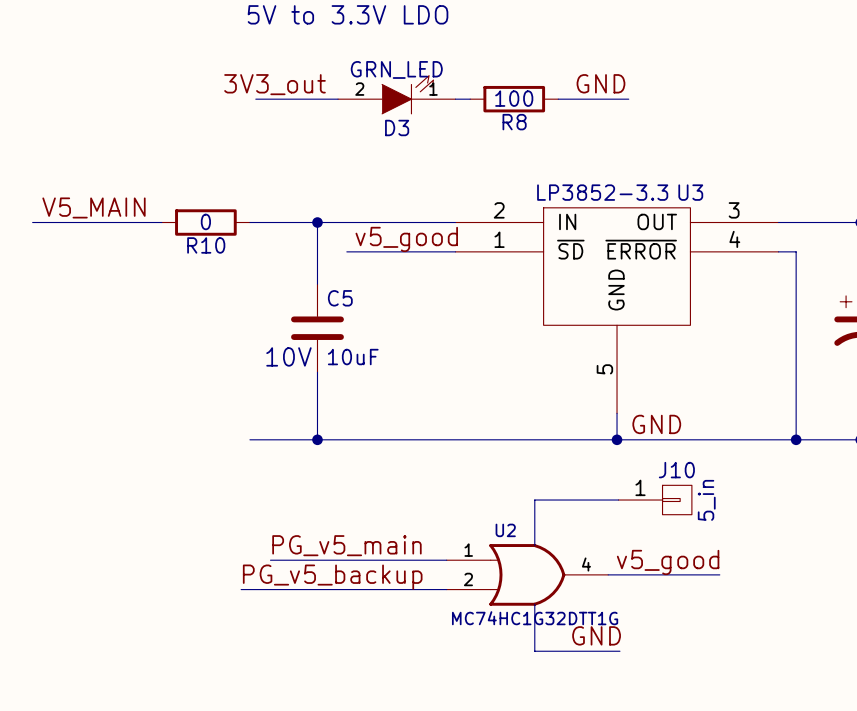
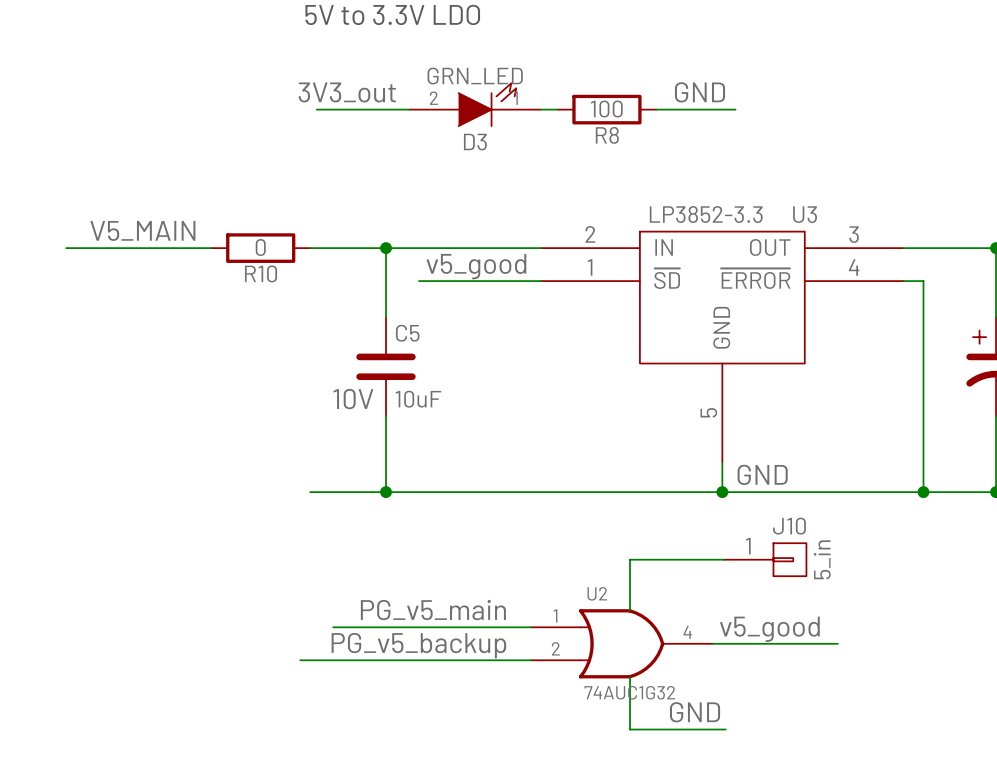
U2 value: MC74HC1G32DTT1G (535, 618) -> 74AUC1G32 (629, 692)

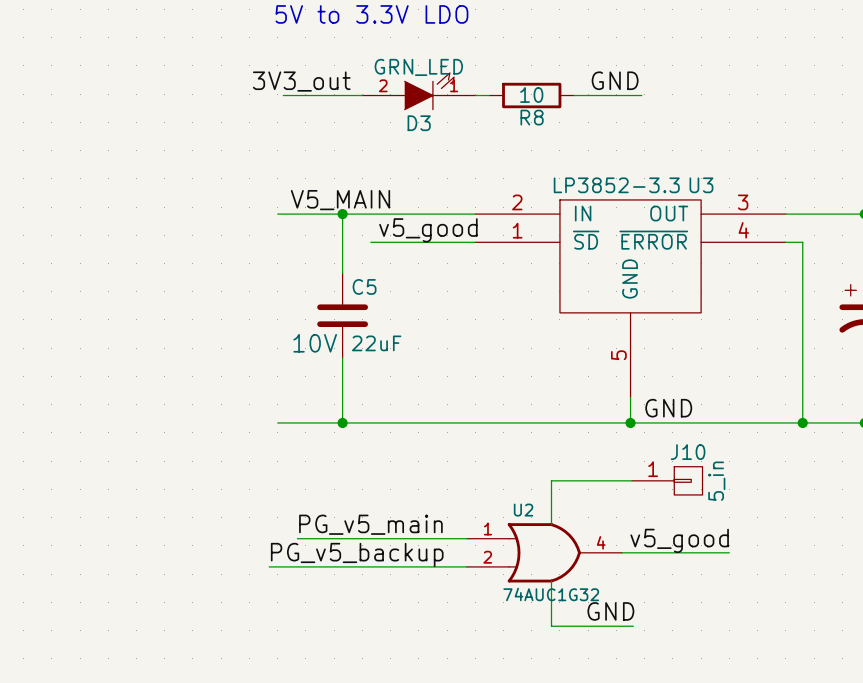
R8 value: 100 (606, 109) -> 10 (531, 94)
label position: V5_MAIN (142, 230) -> V5_MAIN (340, 200)
wire: (66, 248) (211, 248) -> none
R10: 0 (260, 248) -> none
C5 value: 10uF (418, 399) -> 22uF (376, 343)

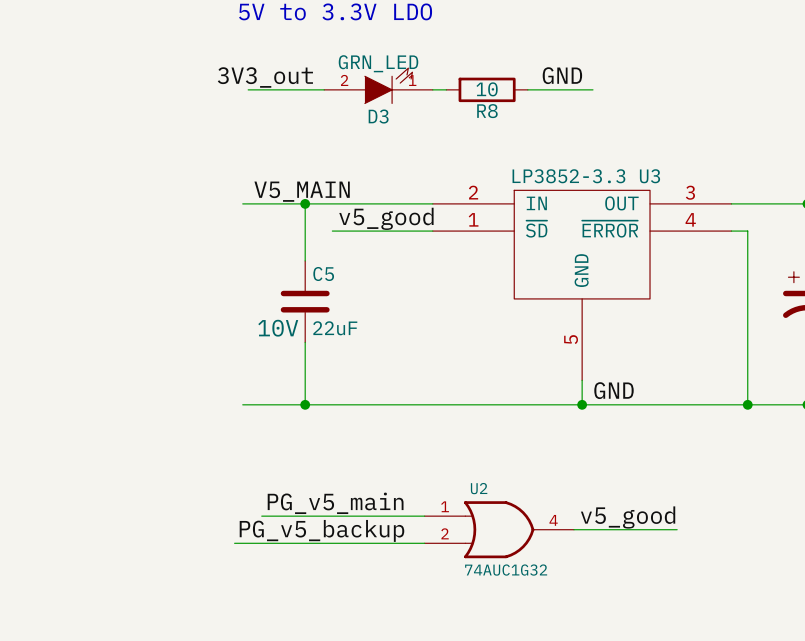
wire: (631, 480) (551, 480) (551, 524) -> none
J10: 5_in (667, 480) -> none
wire: (551, 581) (551, 626) (633, 626) -> none
label: GND (610, 611) -> none

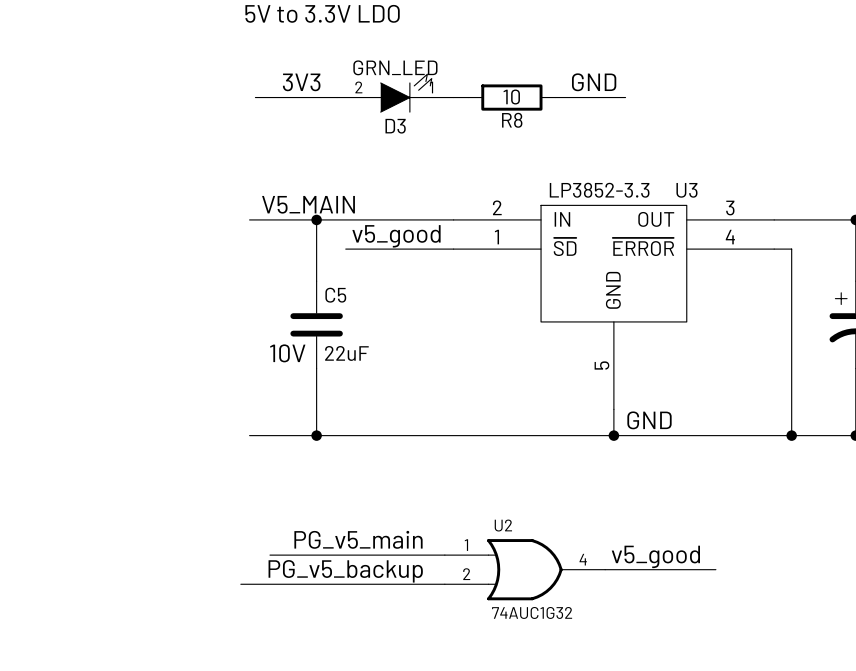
label: none -> 3V3 (301, 82)
label: 3V3_out (265, 77) -> none

